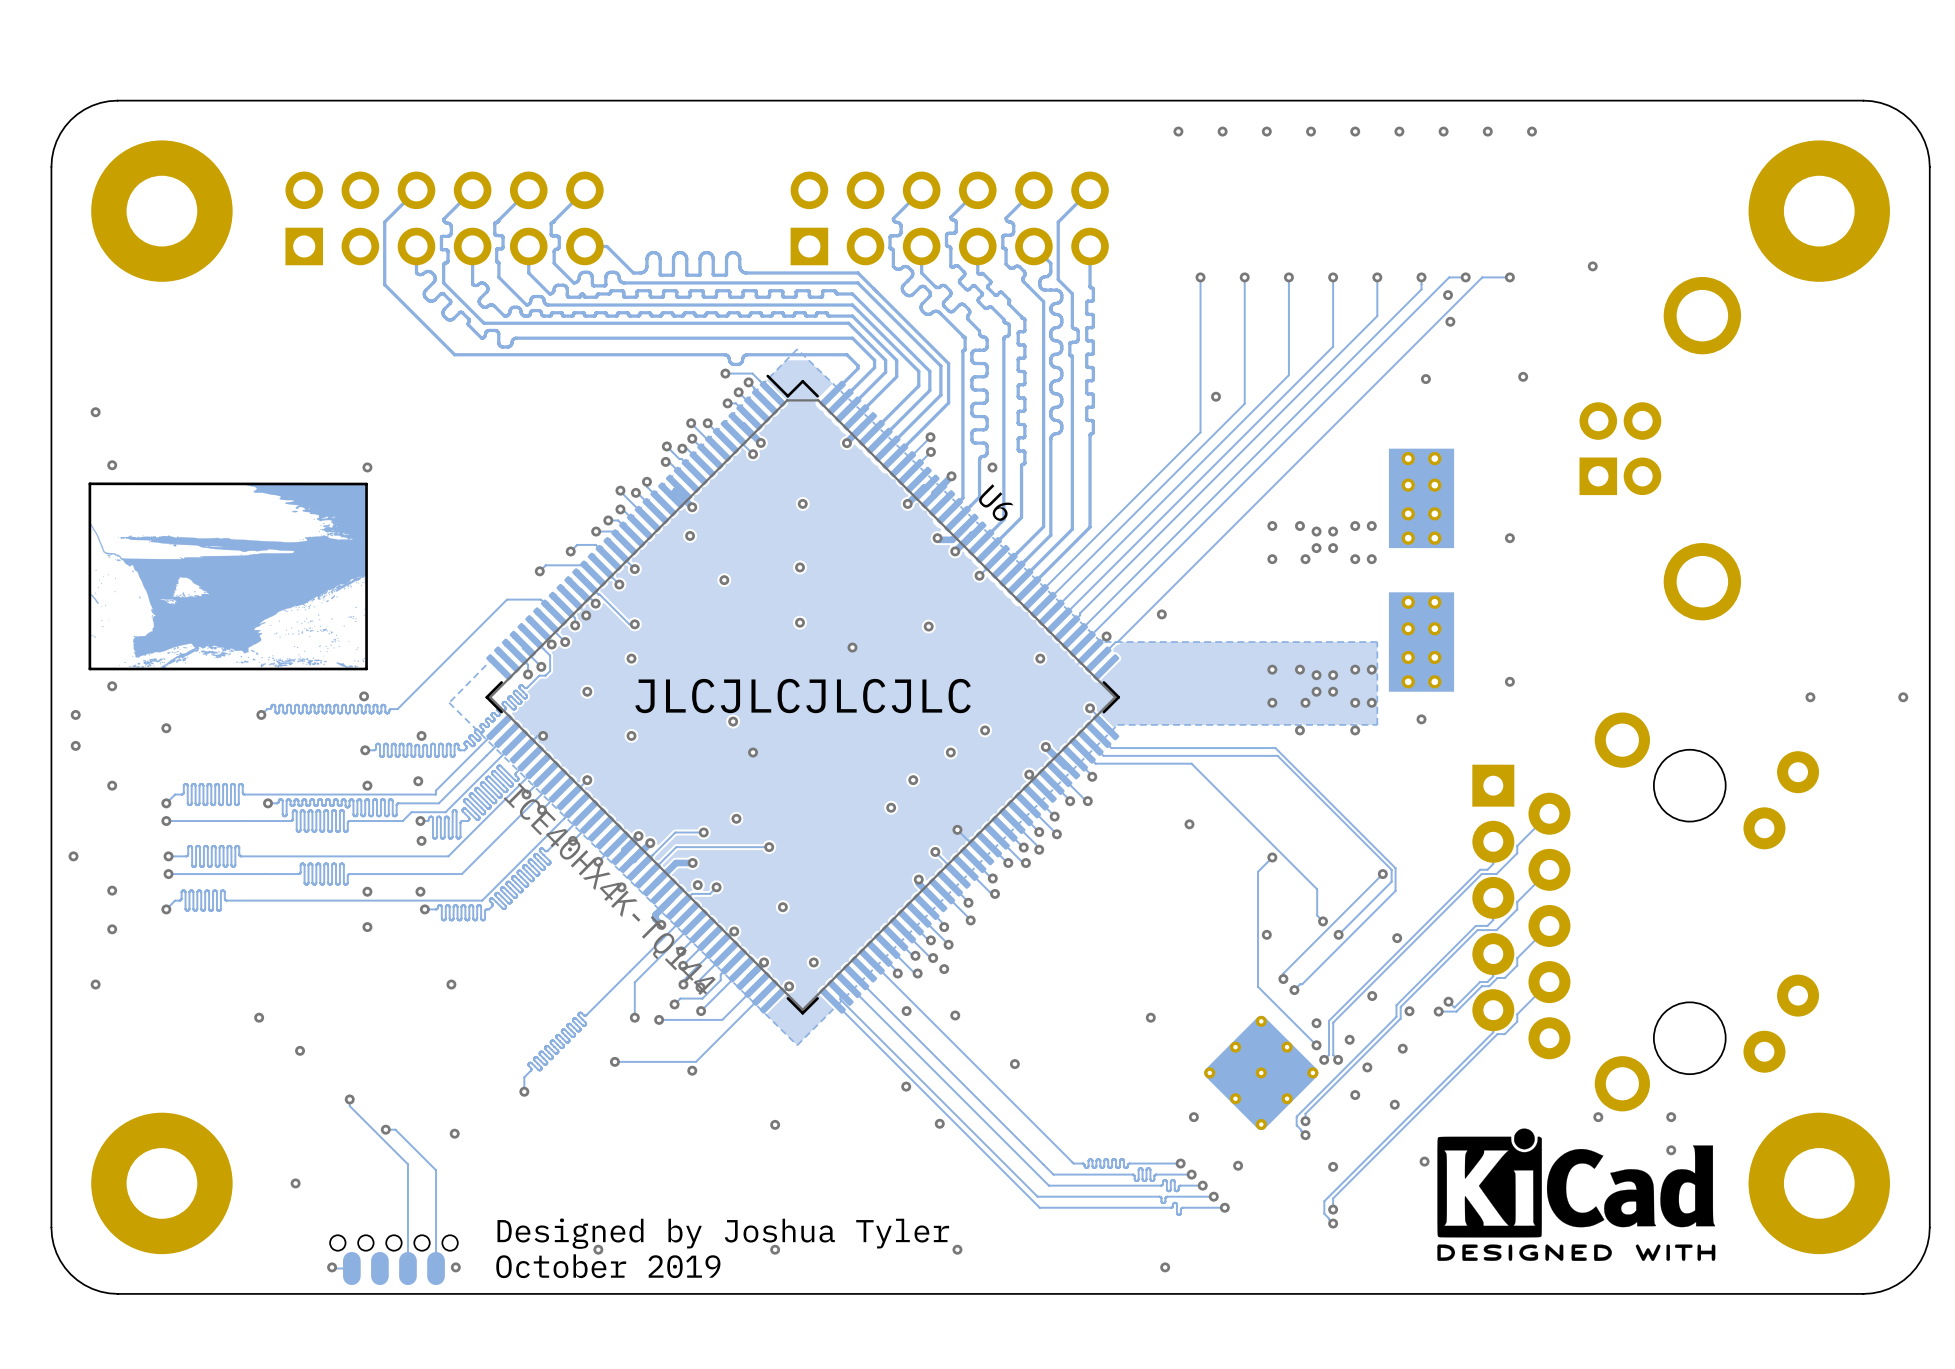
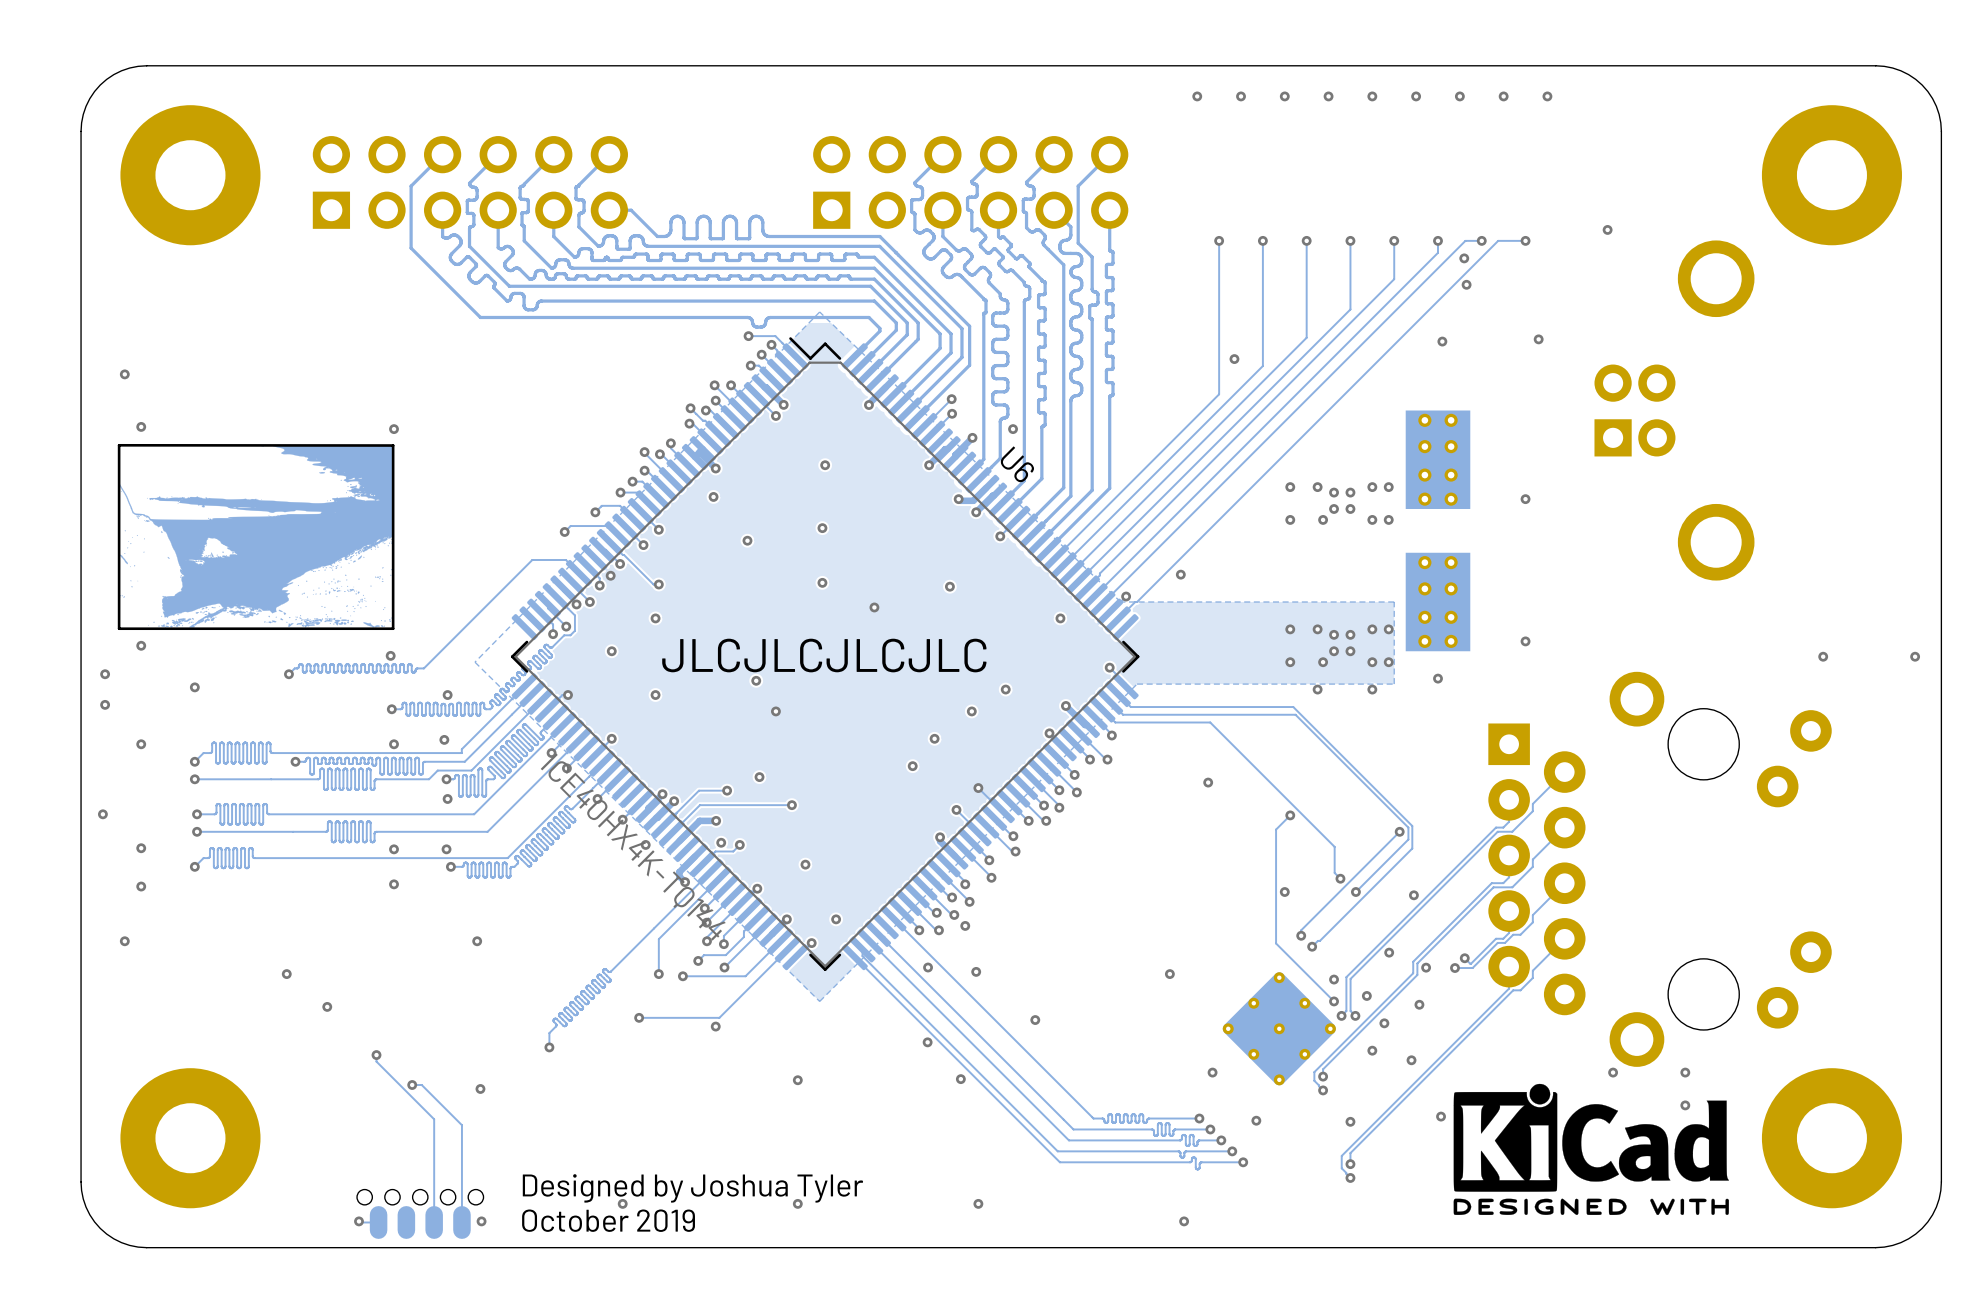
via: (295, 1183) -> none

